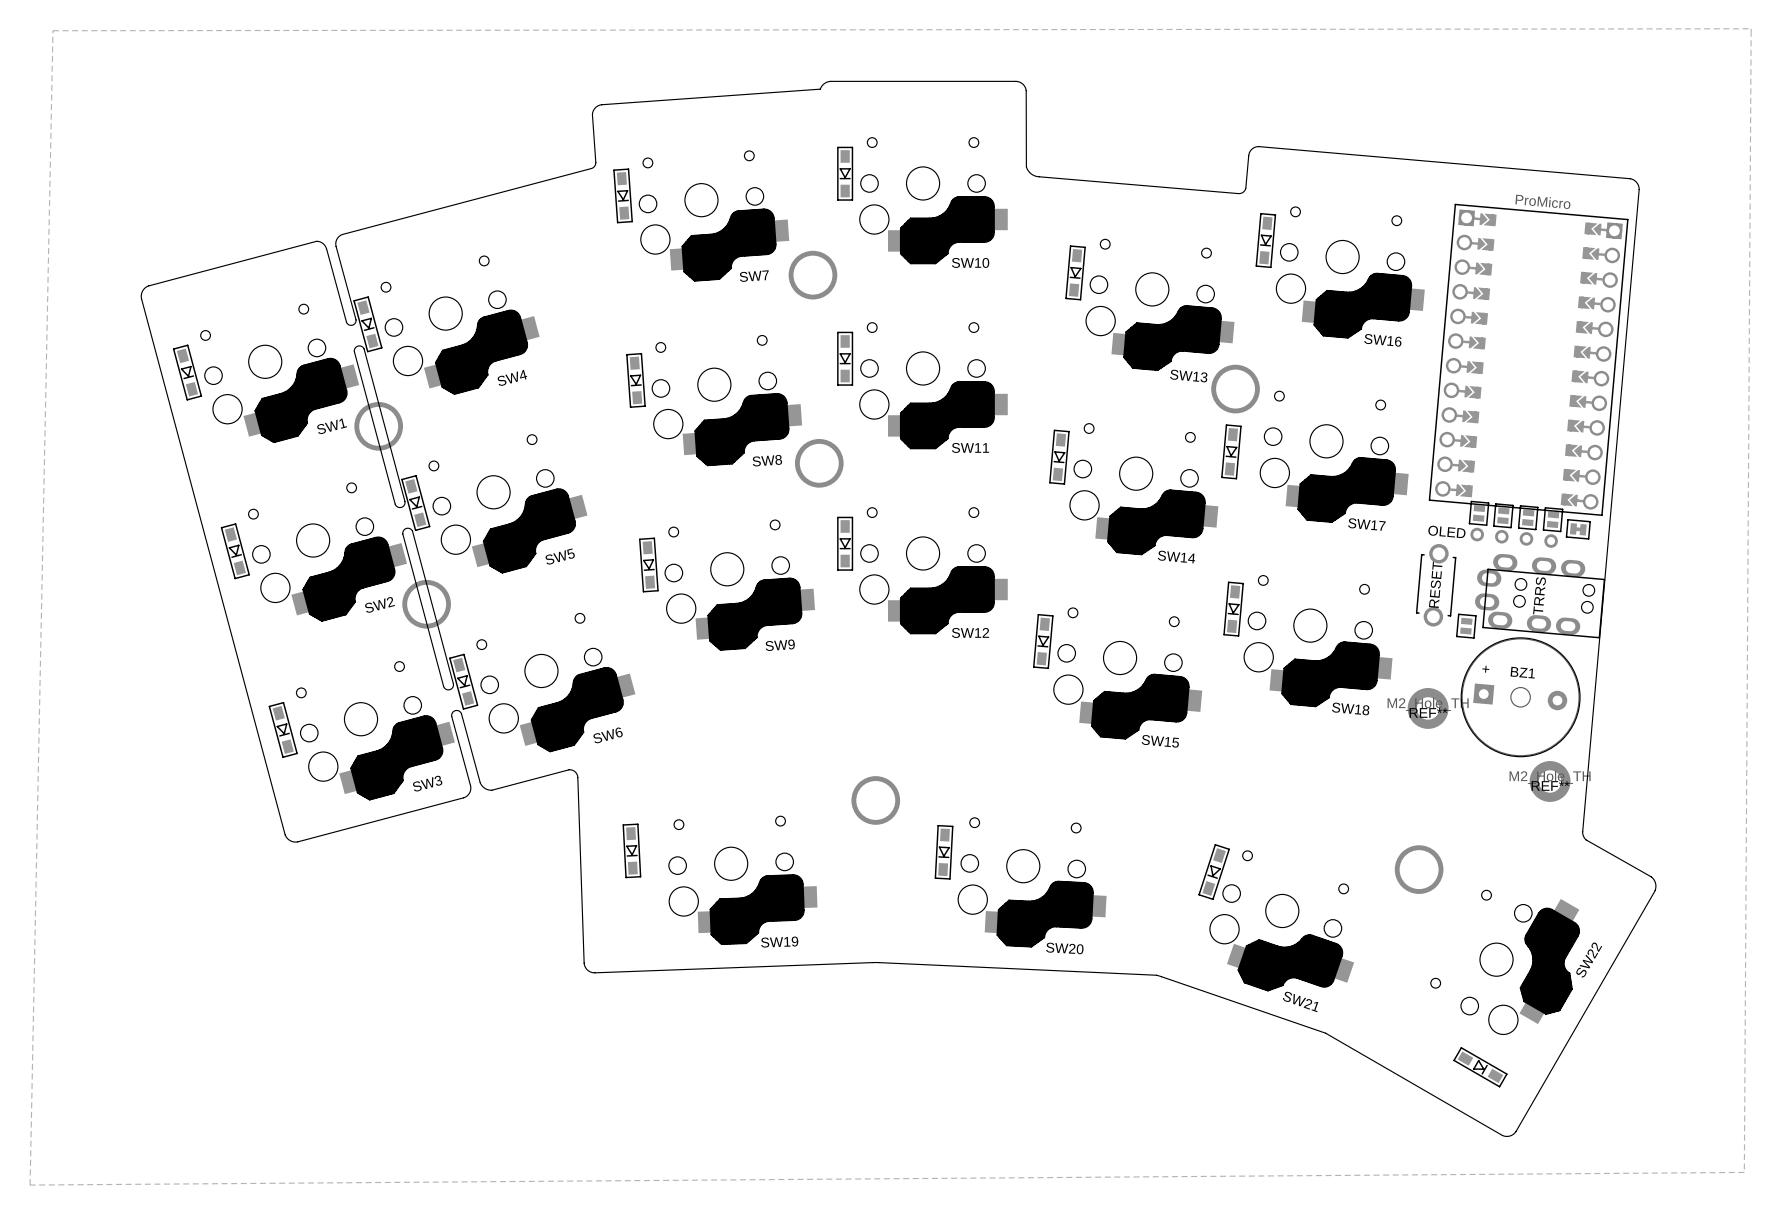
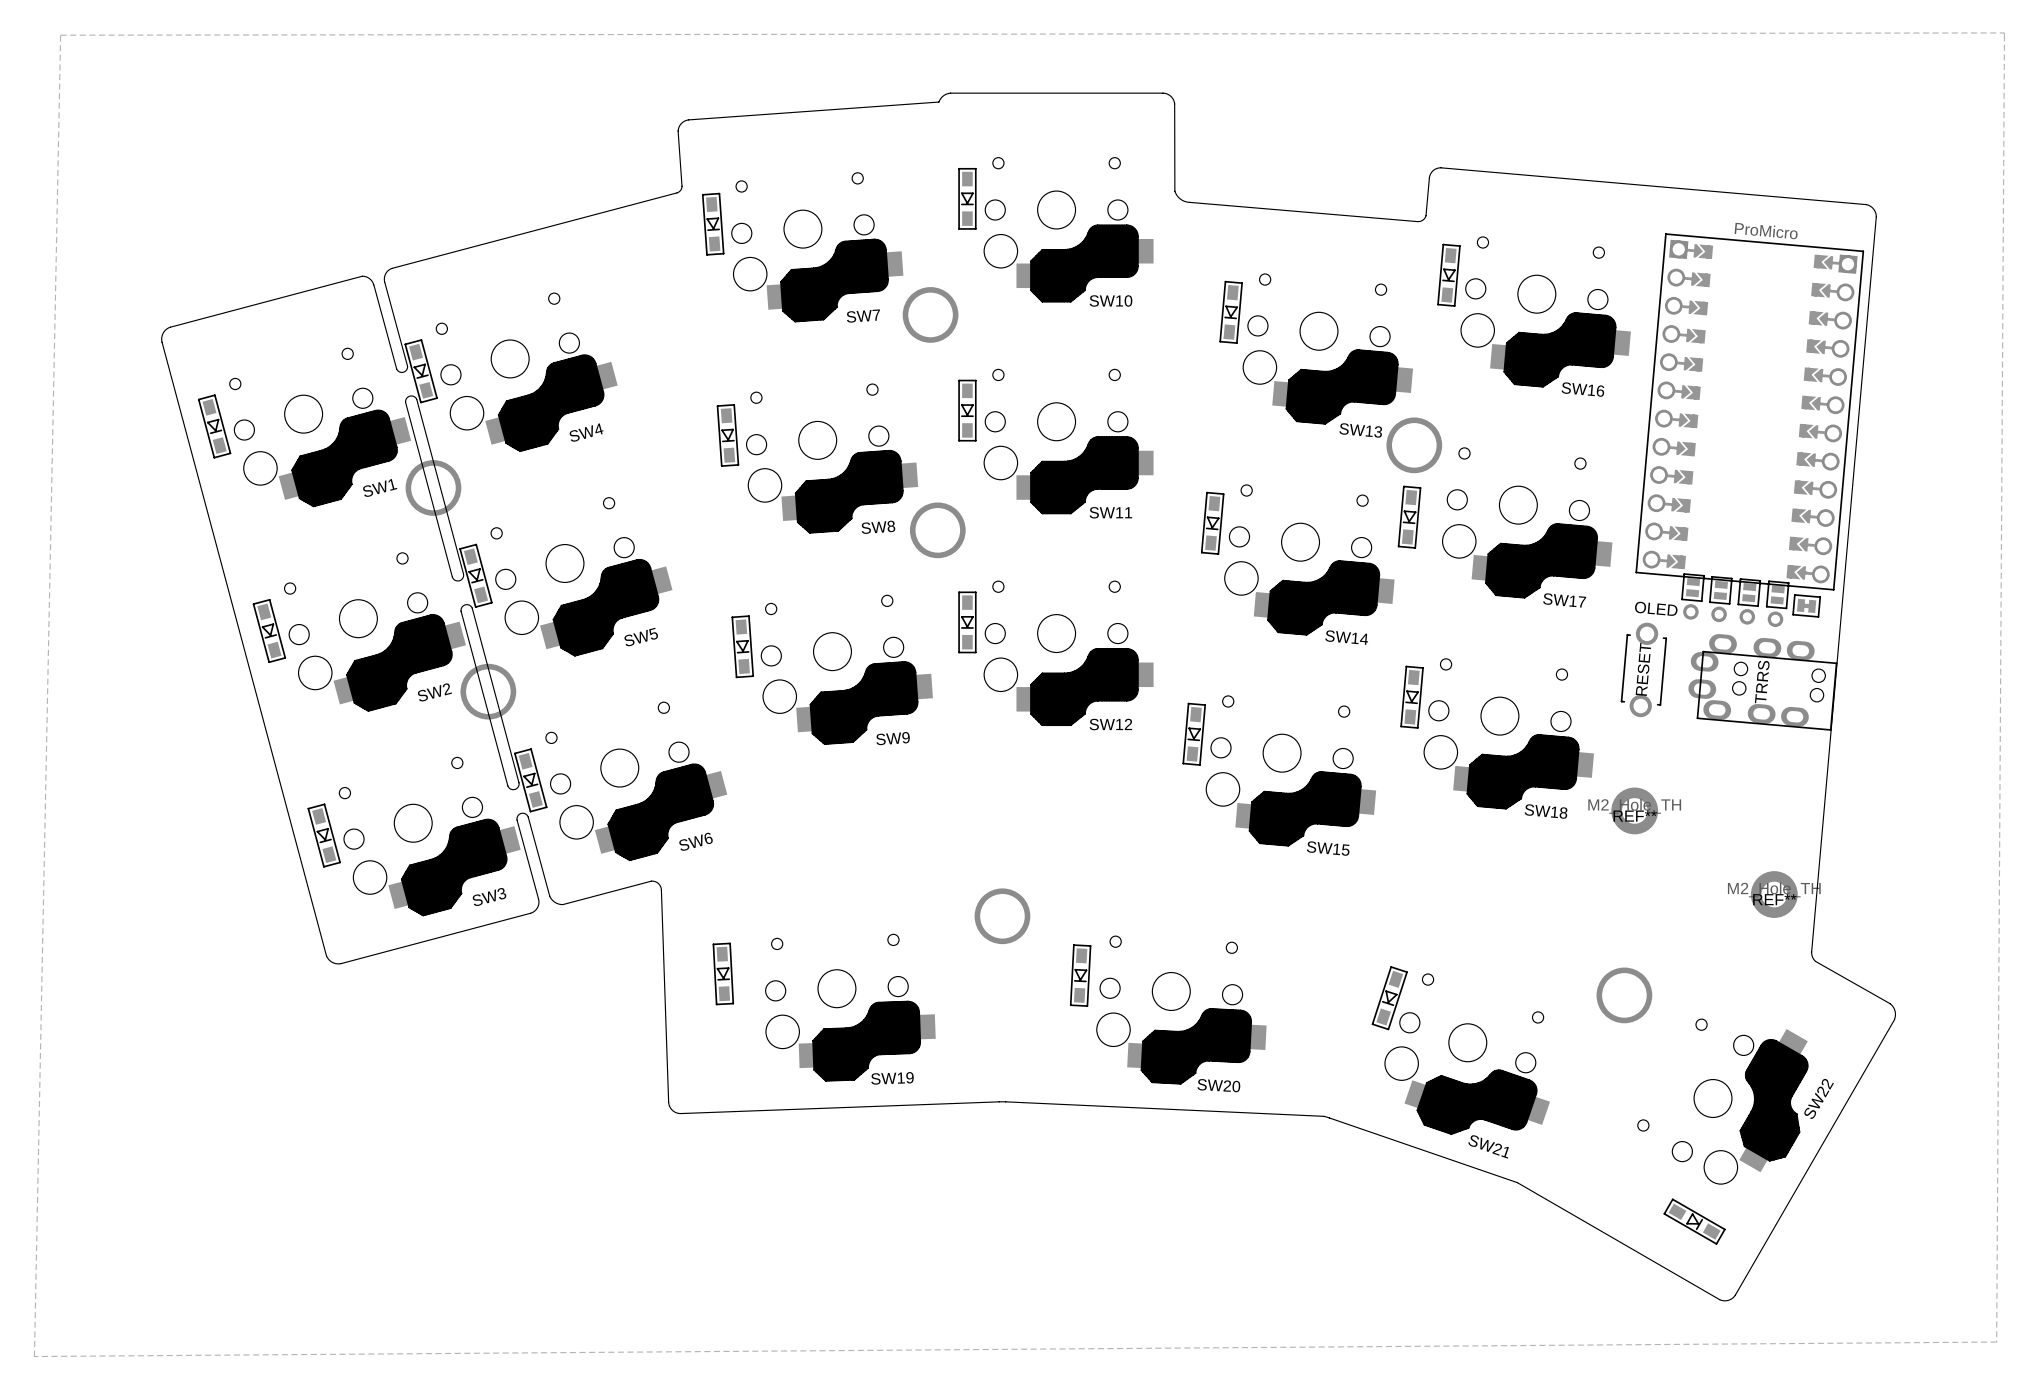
part: (1466, 626) -> none
BZ1: (1520, 697) -> none

